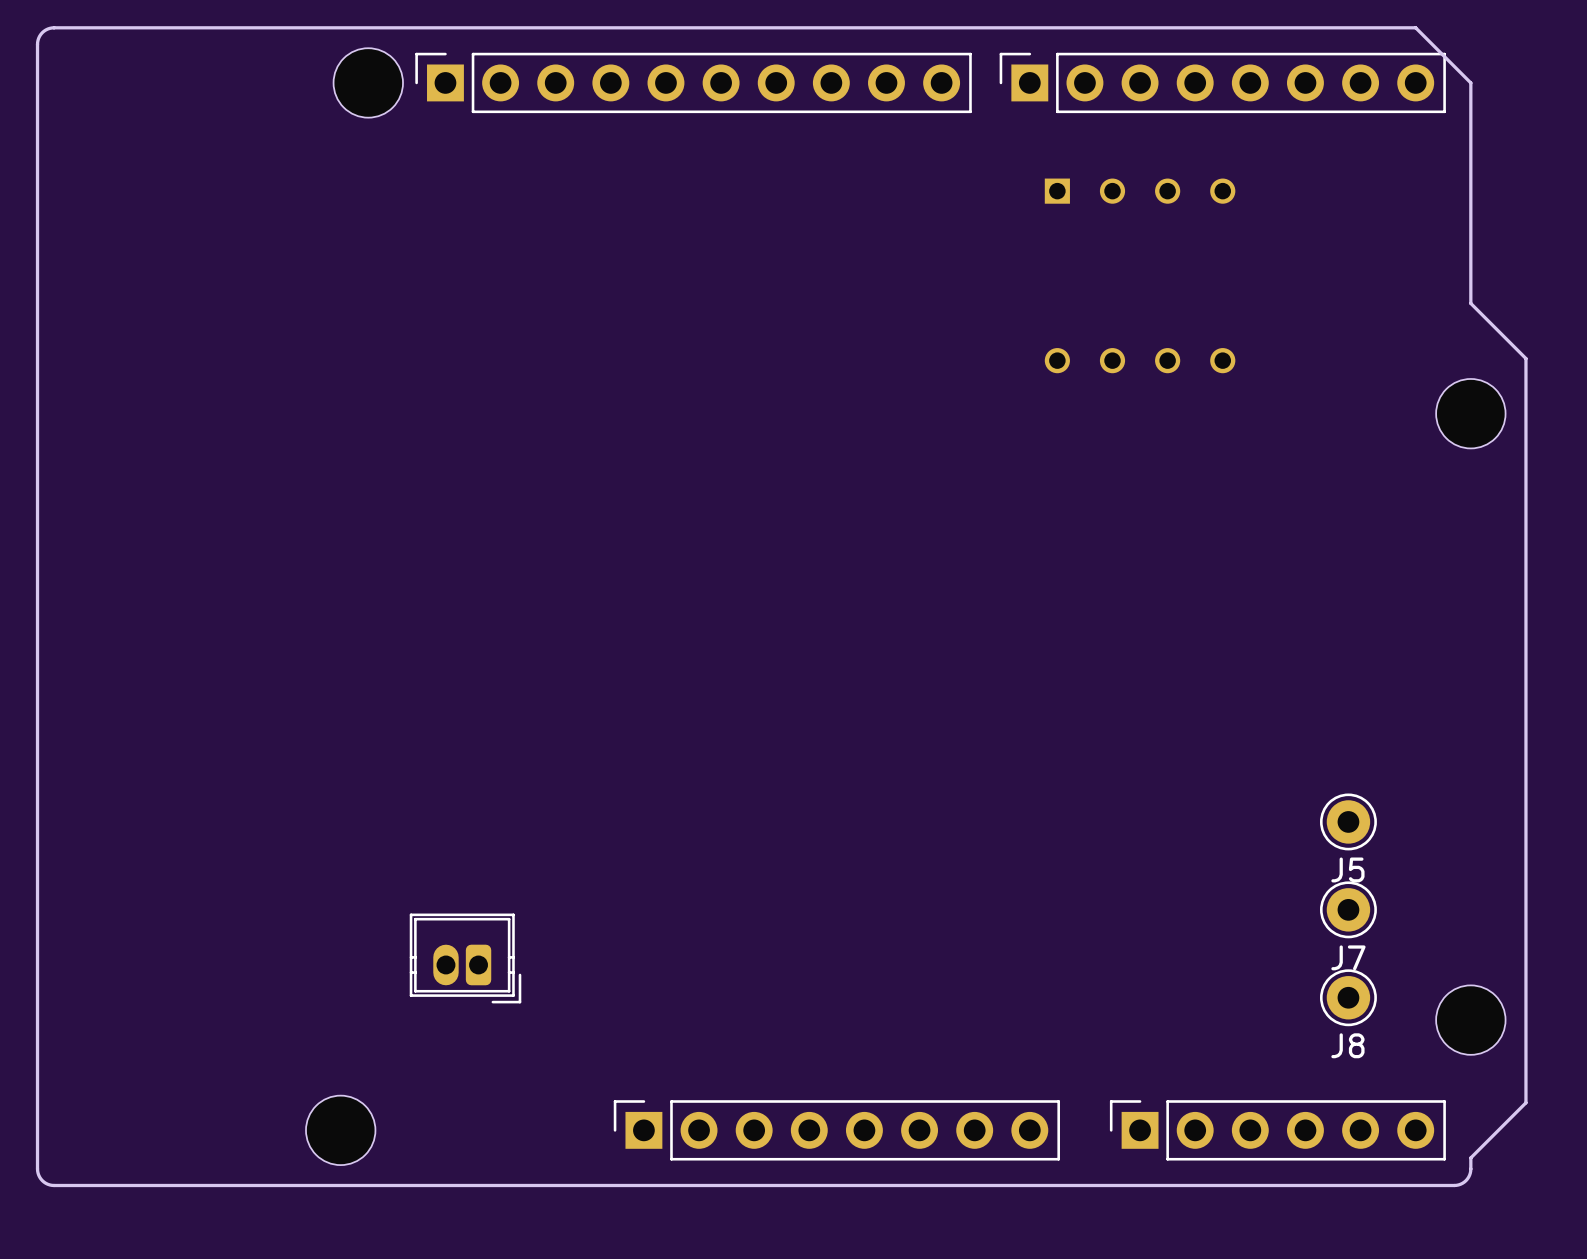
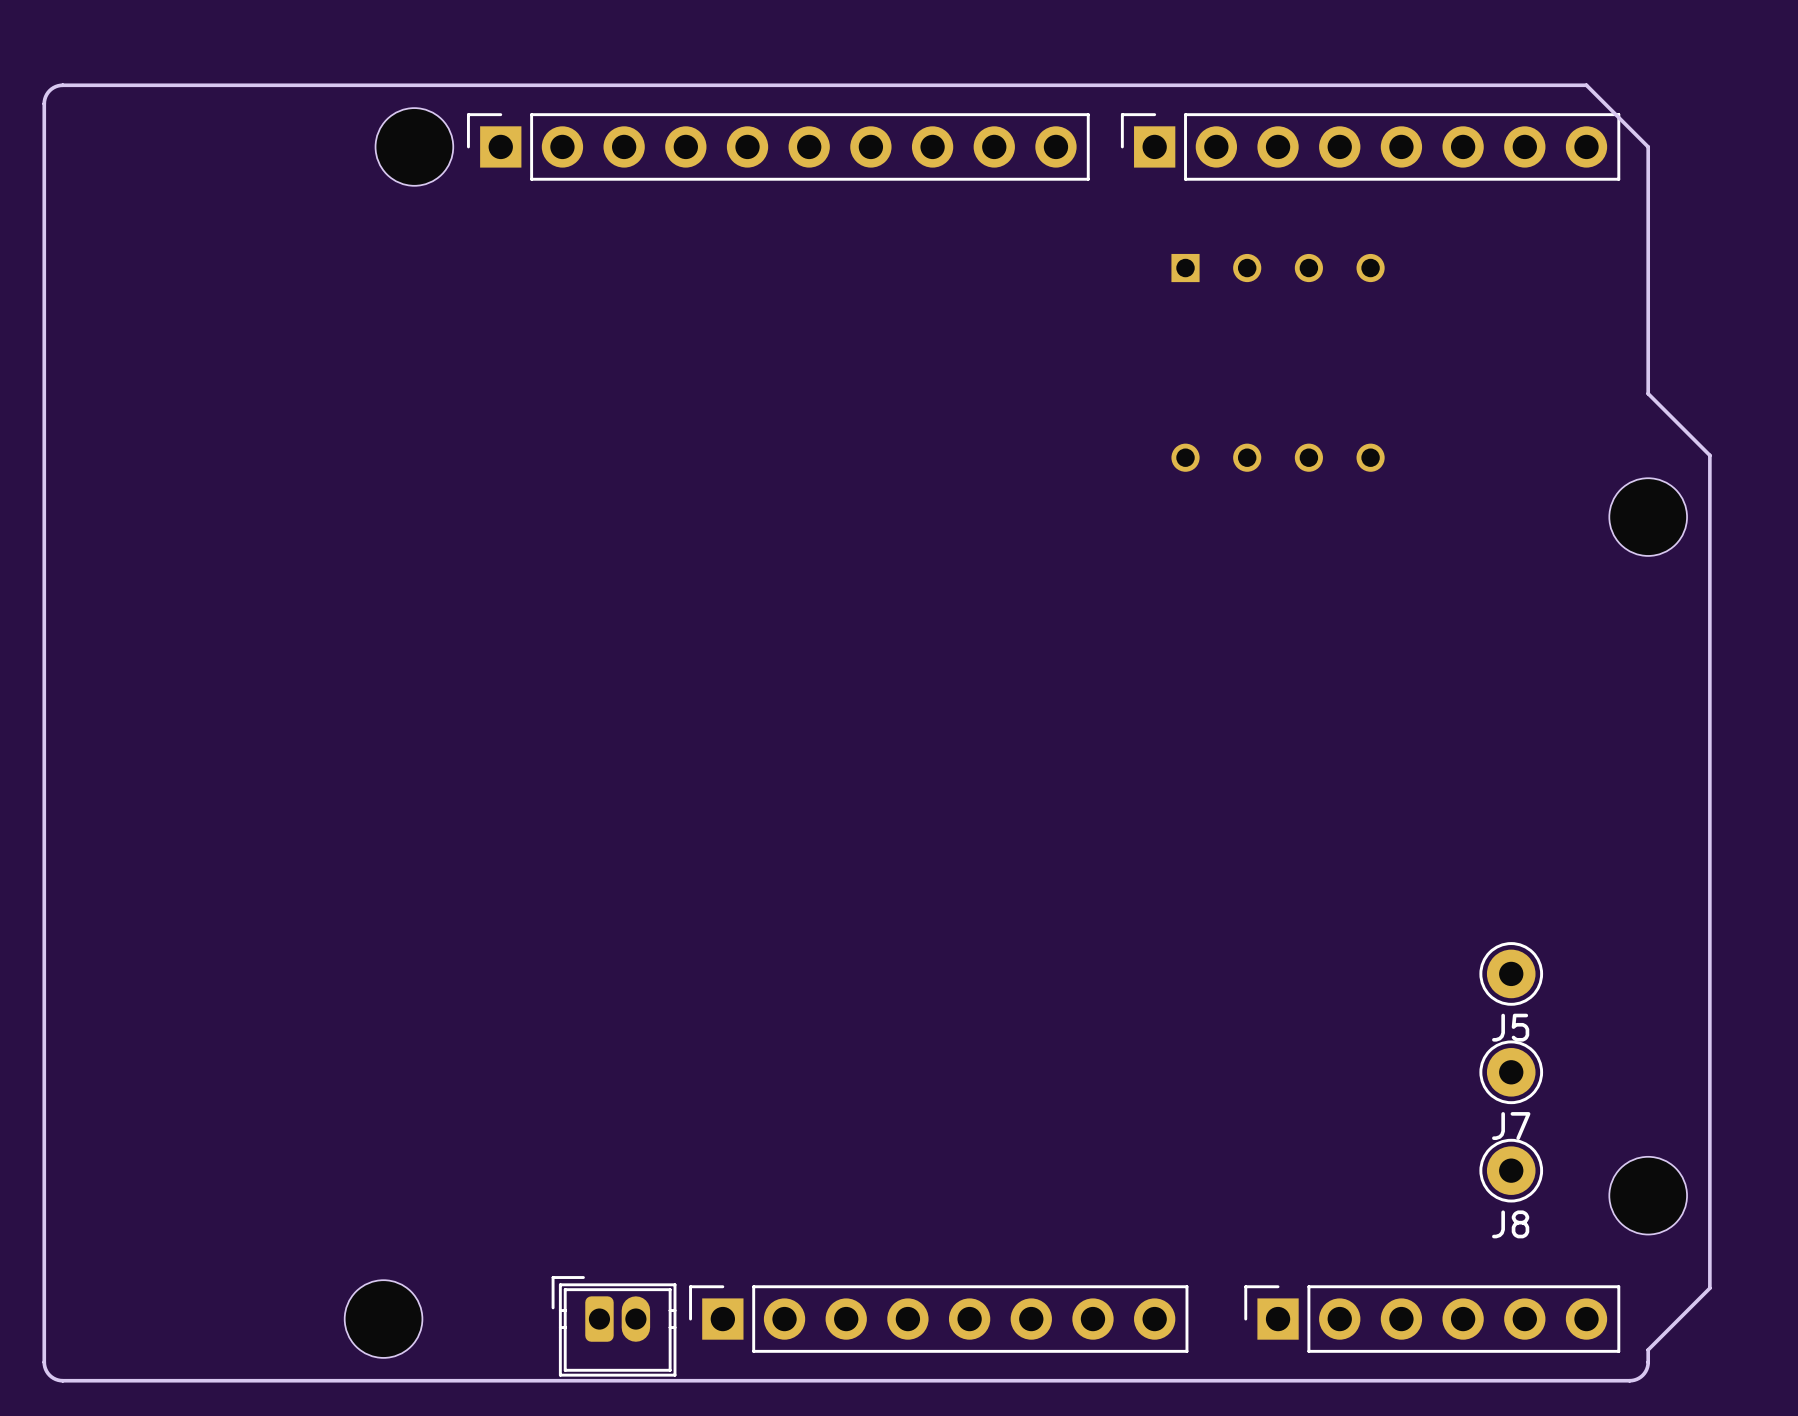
part rotation: 0° (465, 958) -> 180° (614, 1326)
part position: (465, 958) -> (614, 1326)

